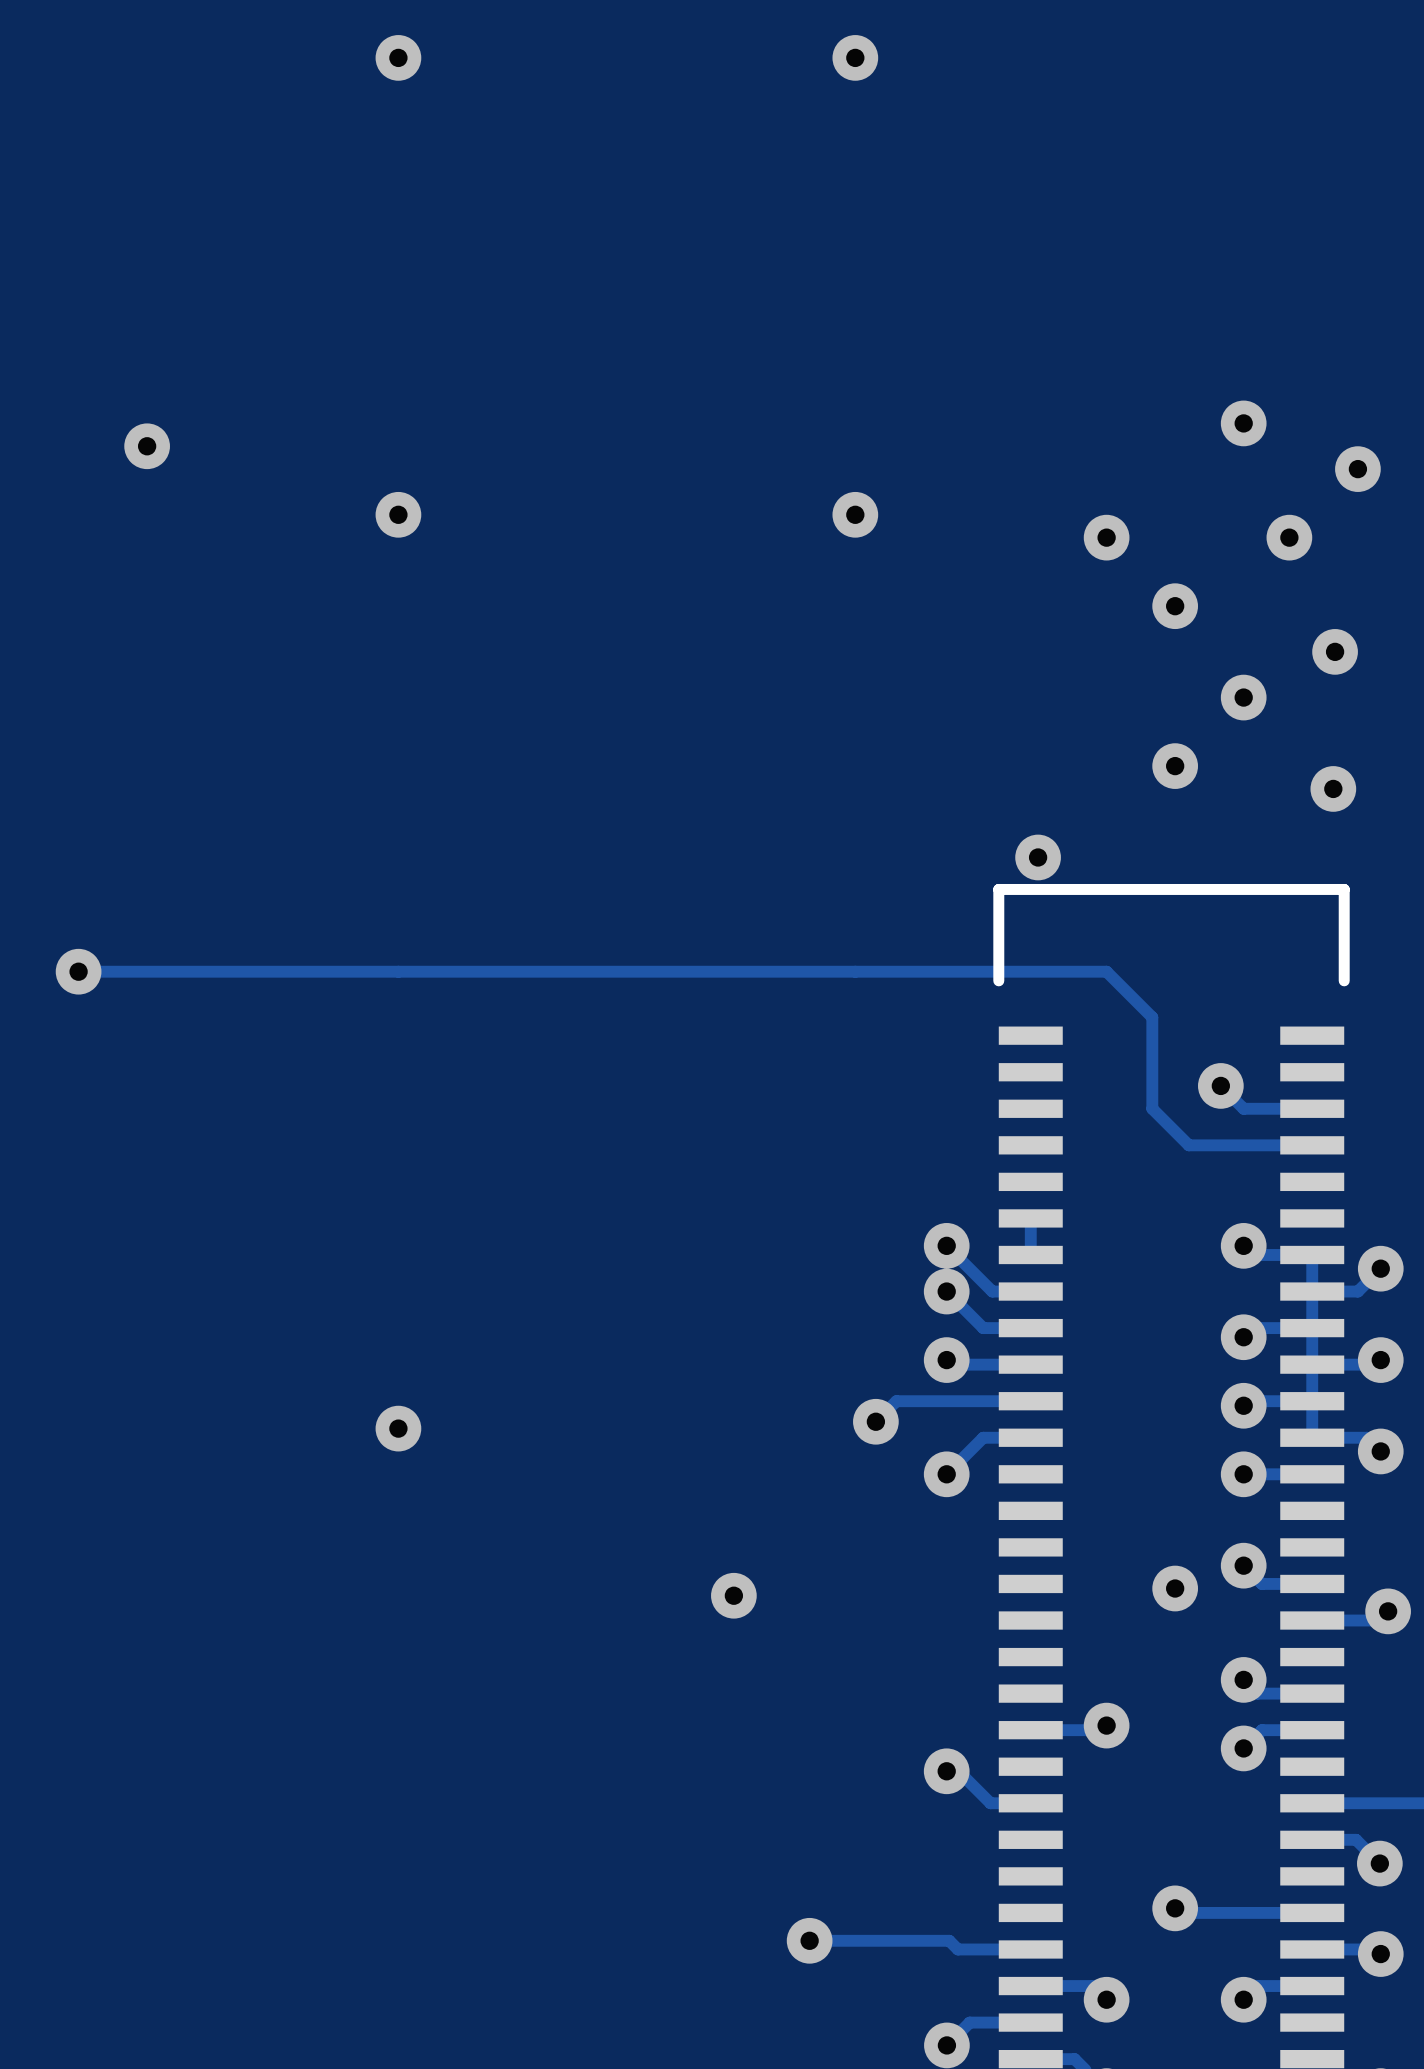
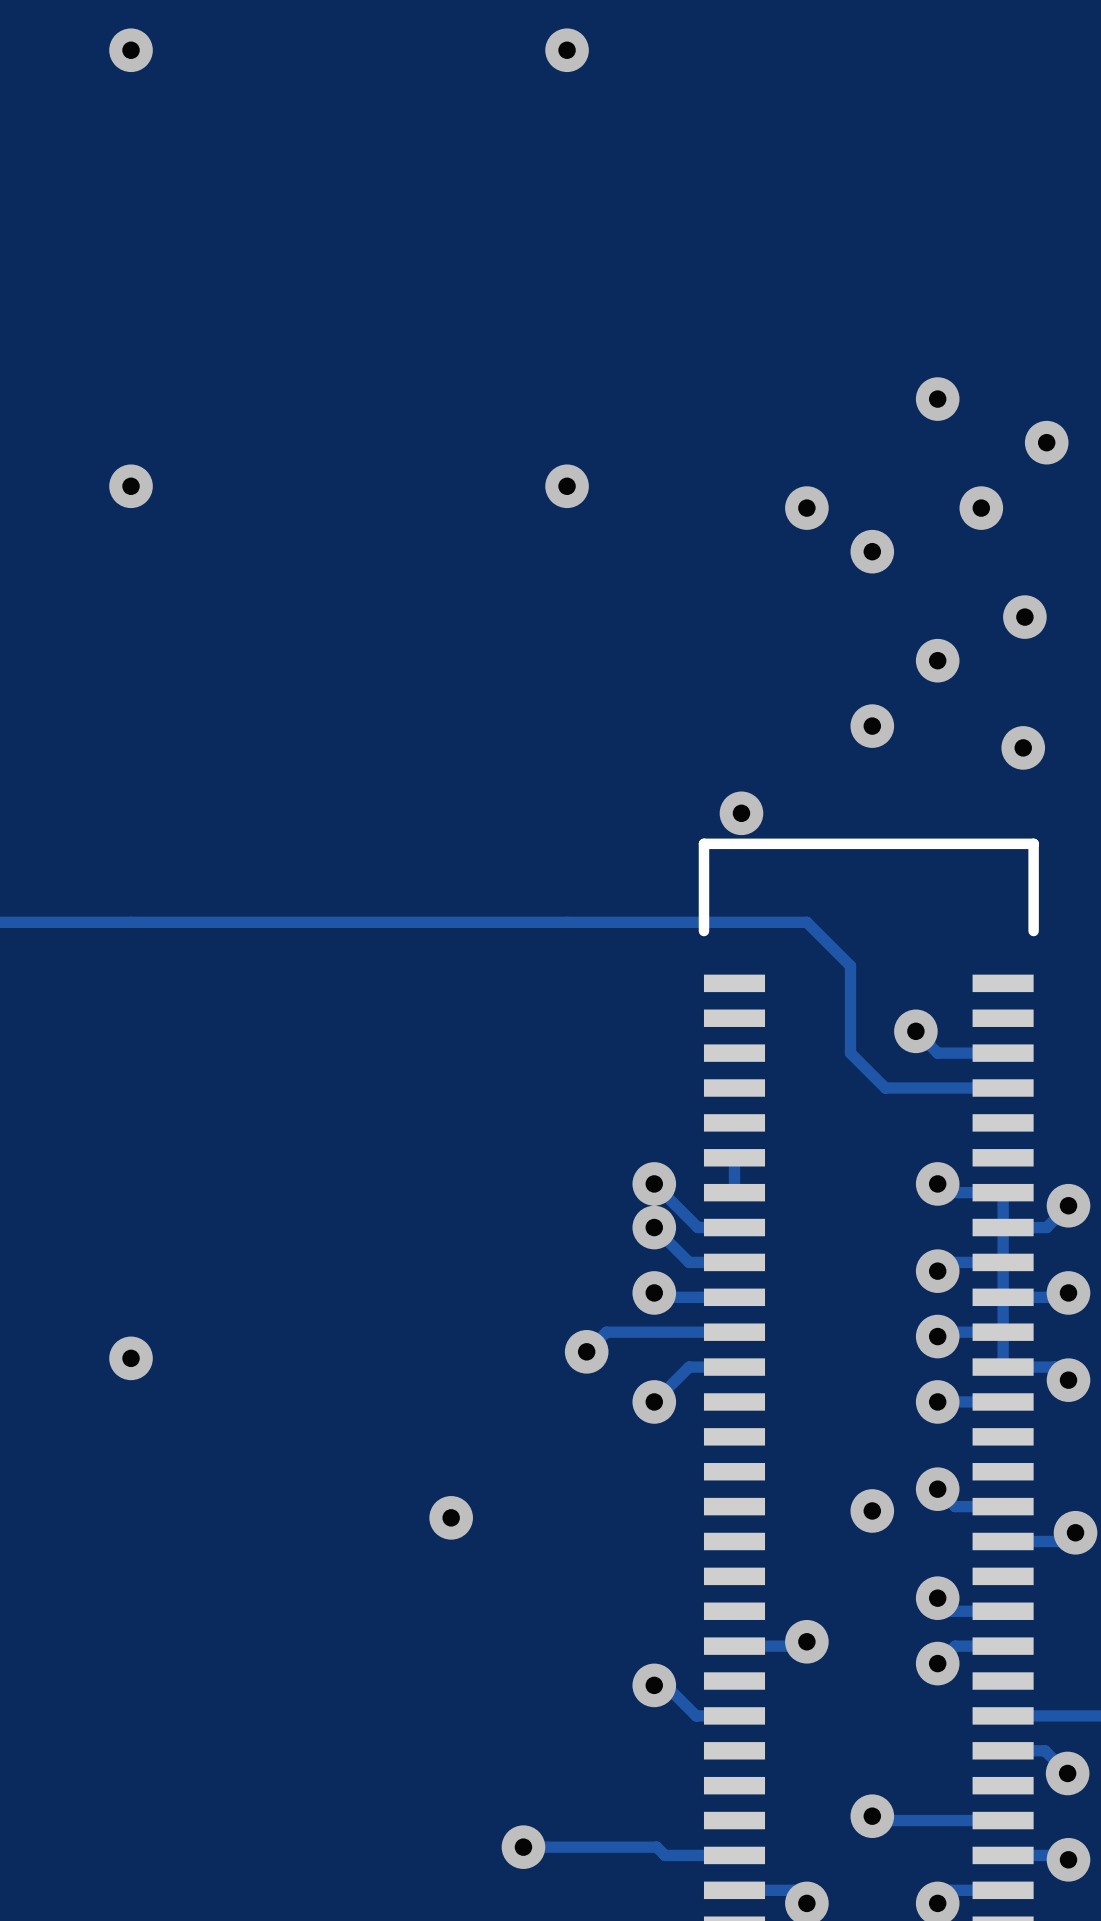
via position: (1175, 606) -> (872, 551)

